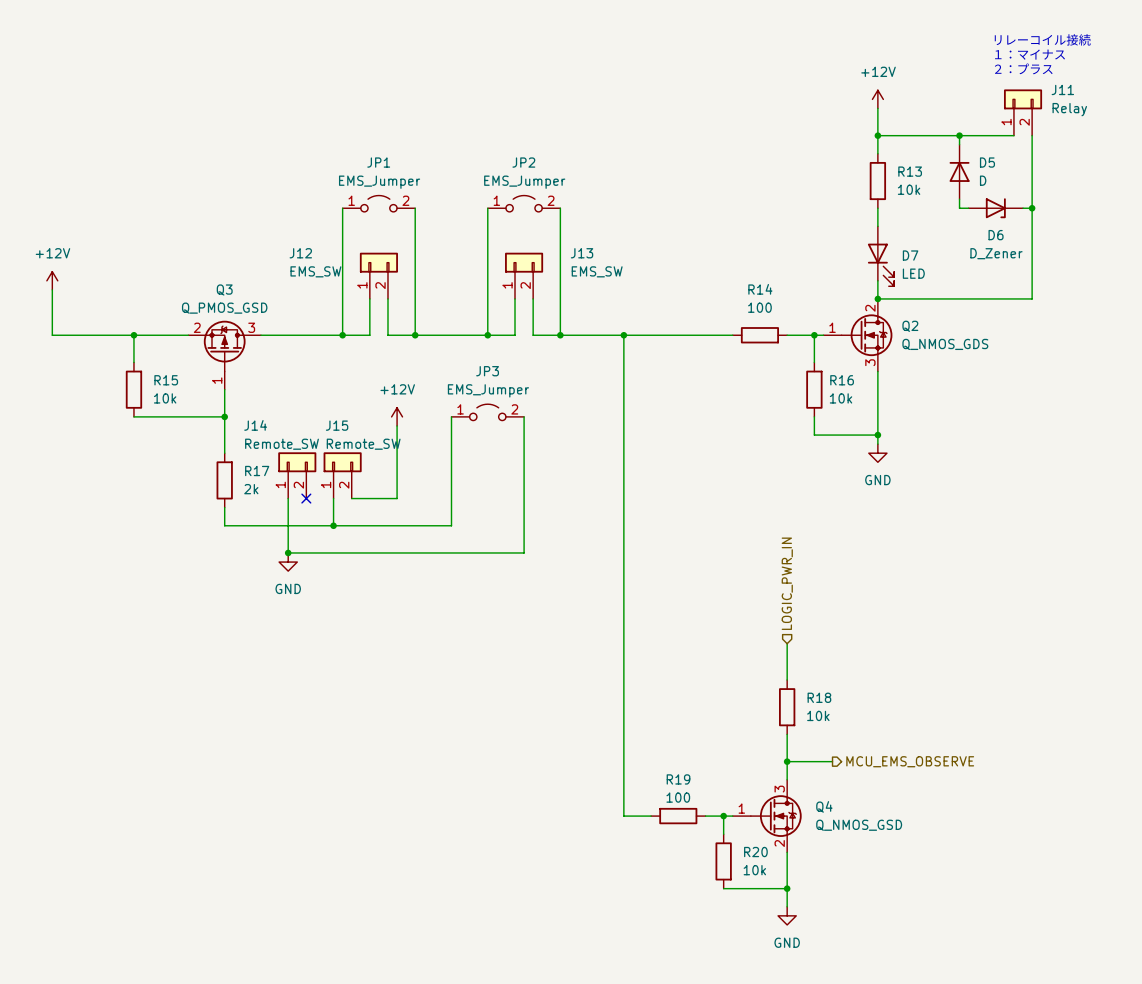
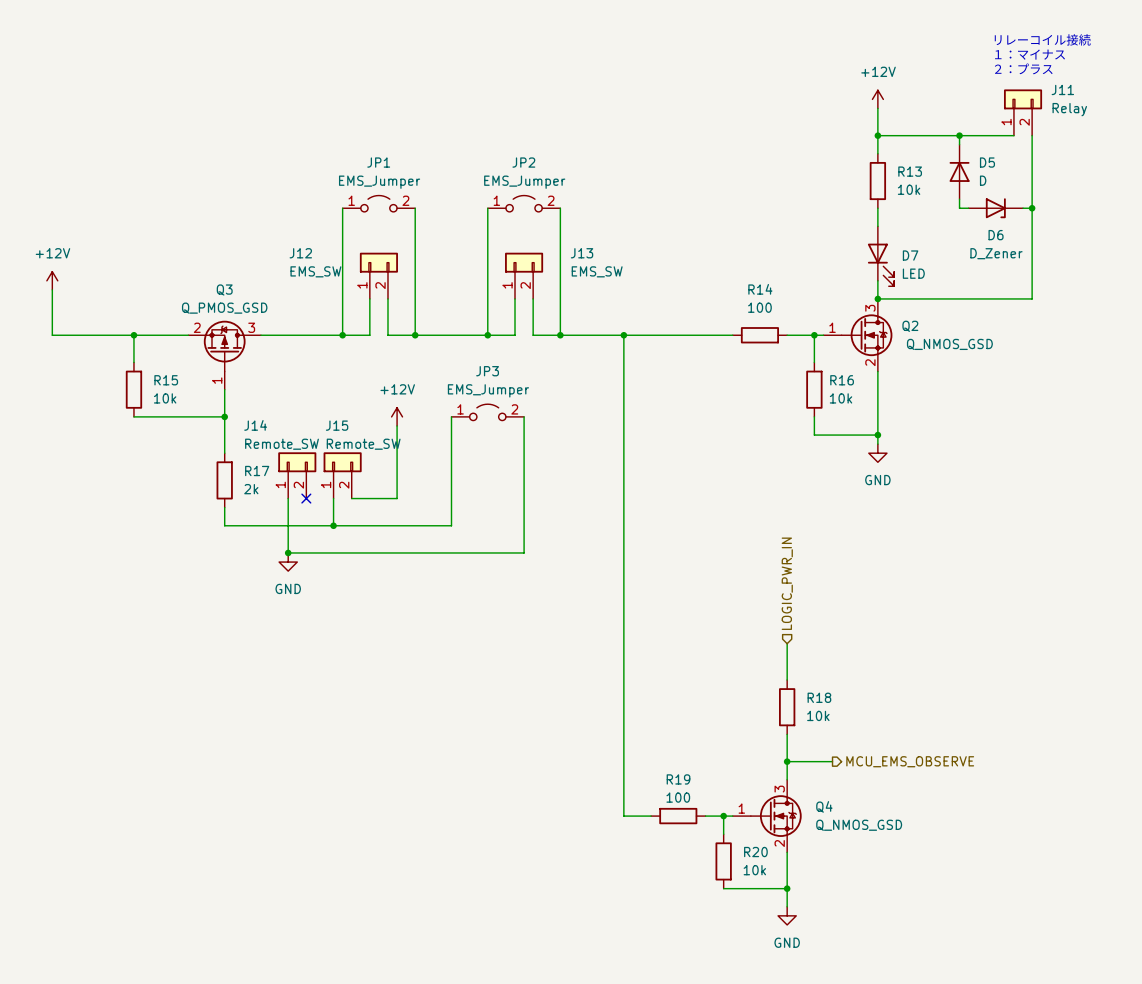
Q2 pin number: 2 (870, 308) -> 3 (870, 308)
Q2 value: Q_NMOS_GDS (945, 344) -> Q_NMOS_GSD (949, 344)
Q2 pin number: 3 (870, 362) -> 2 (870, 362)

